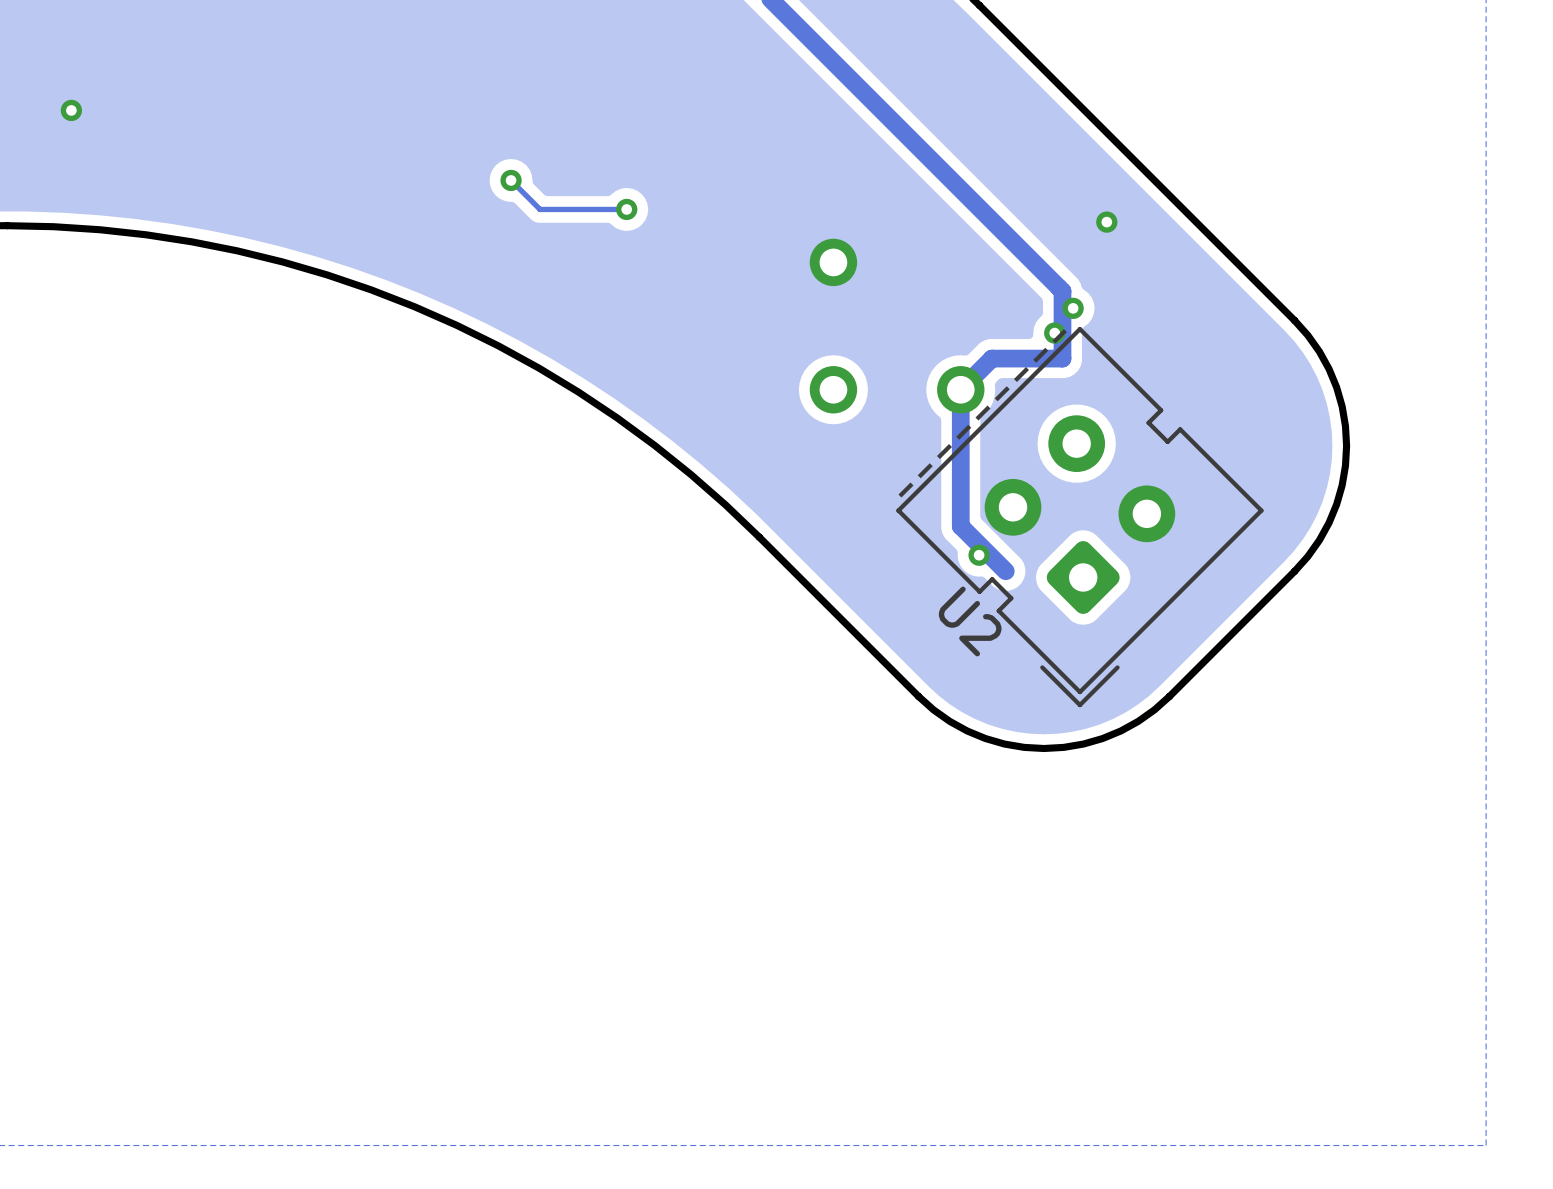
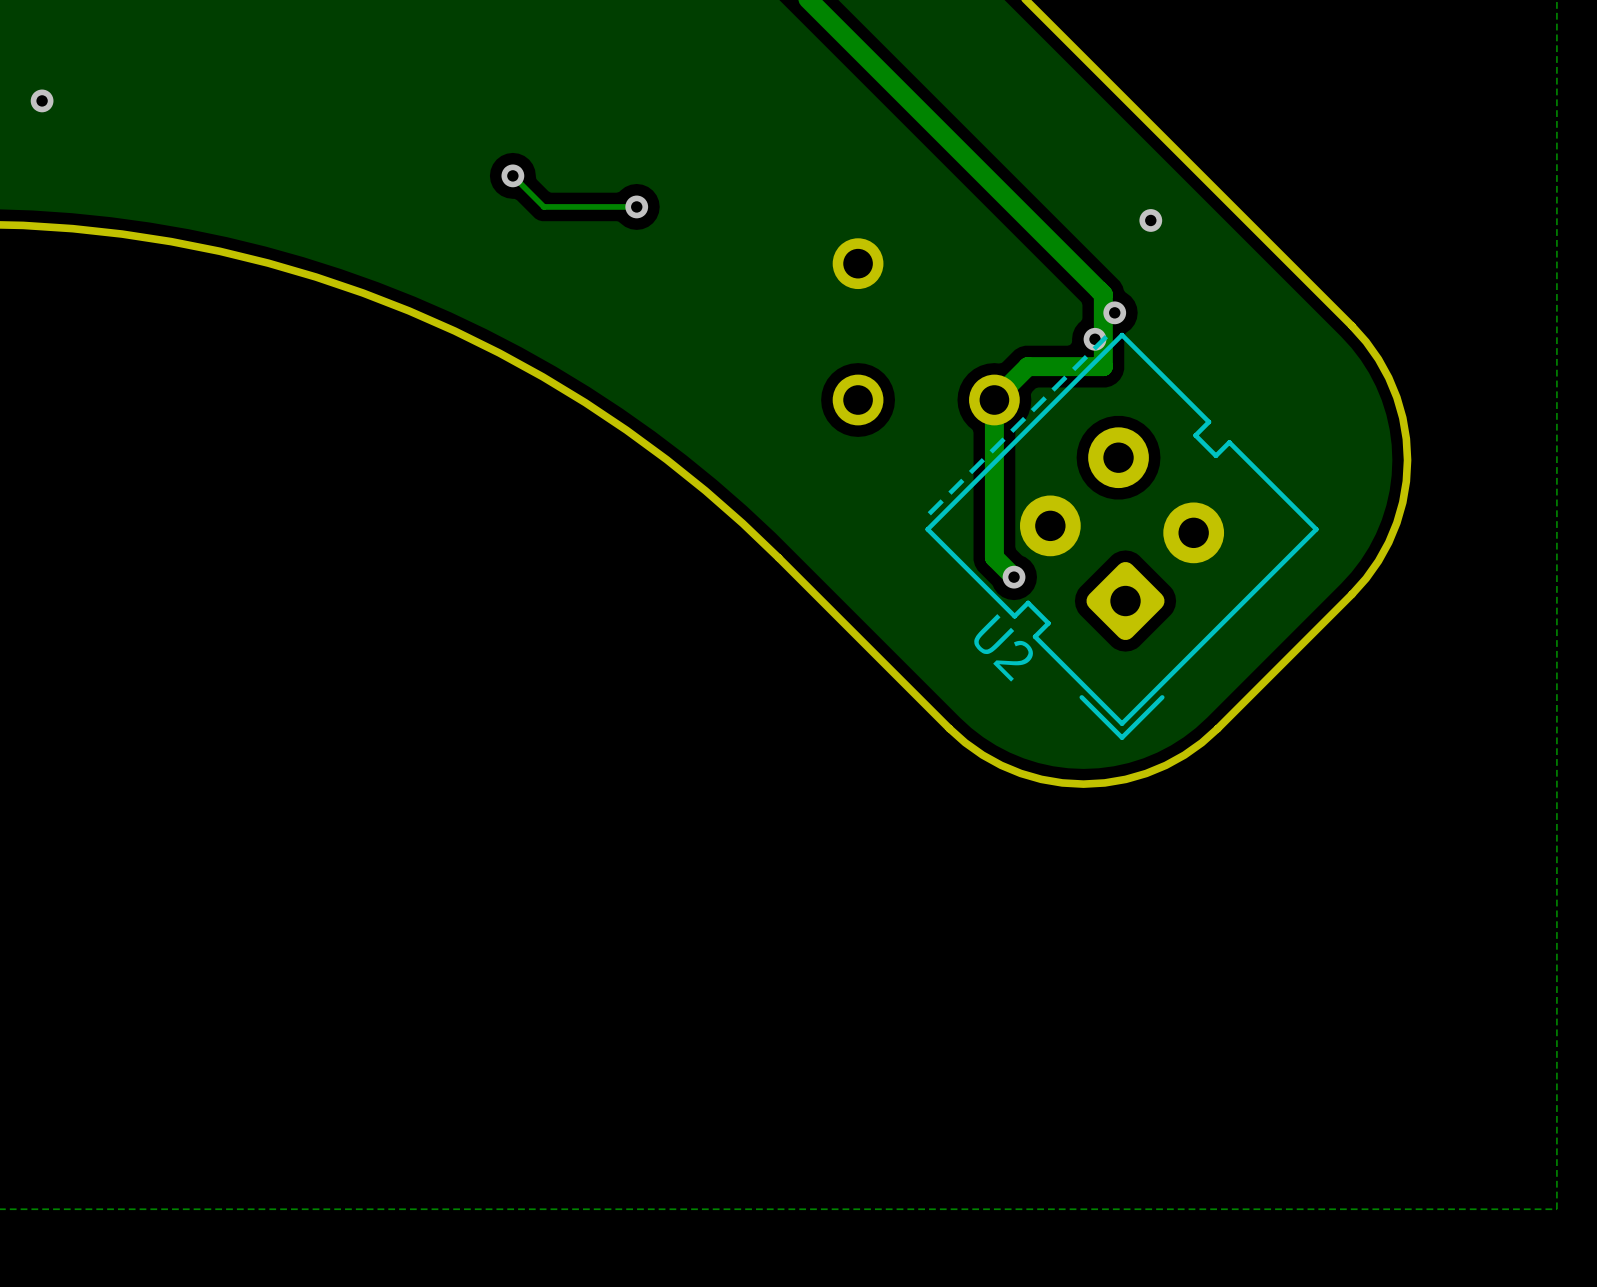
track: (960, 526) (1005, 571) -> (994, 546) (994, 557) (1014, 577)

